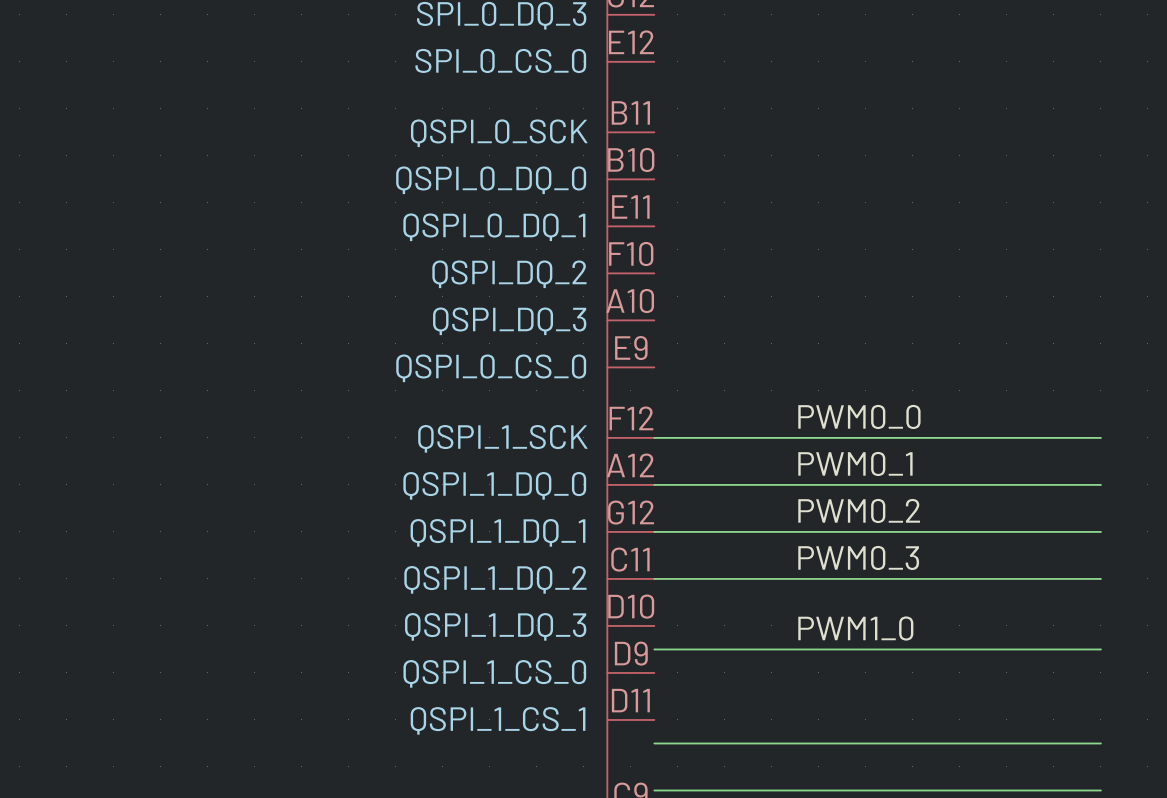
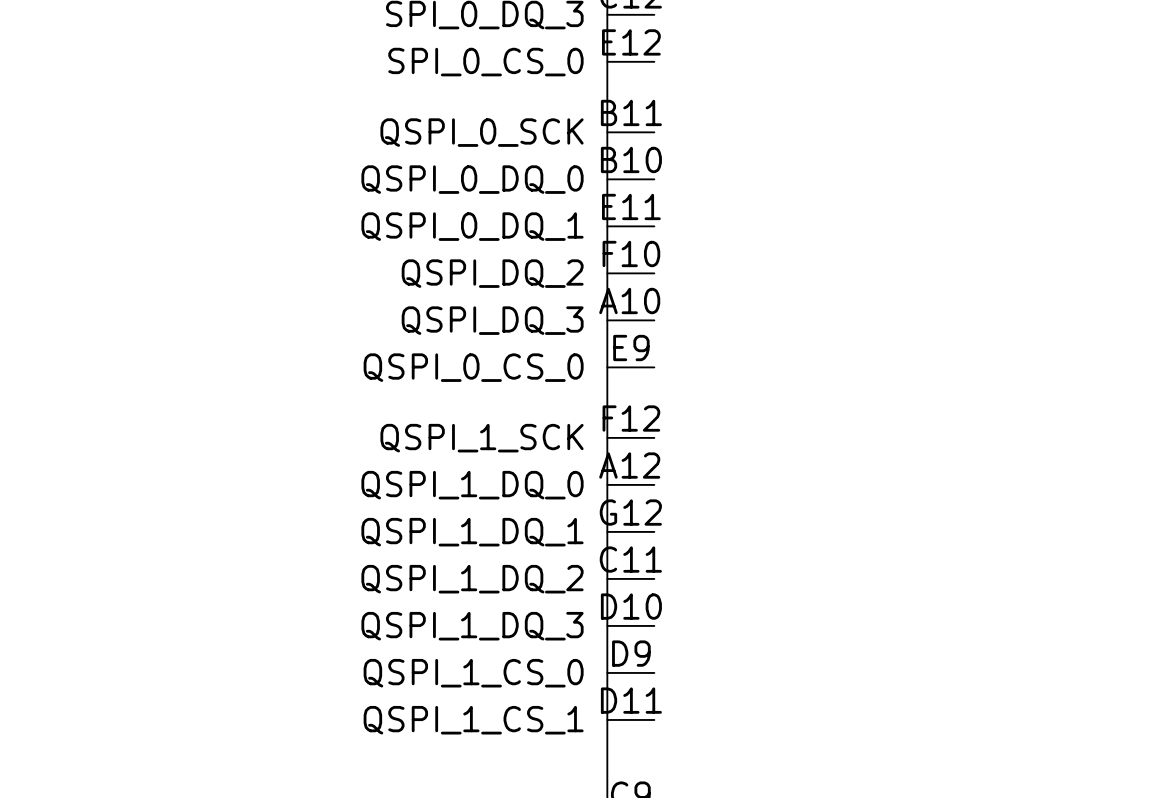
label: PWM0_0 (859, 416) -> none
wire: (654, 437) (1100, 437) -> none
label: PWM0_1 (855, 463) -> none
wire: (654, 484) (1100, 484) -> none
label: PWM0_2 (859, 510) -> none
wire: (654, 531) (1100, 531) -> none
label: PWM0_3 (858, 557) -> none
wire: (654, 578) (1100, 578) -> none
label: PWM1_0 (855, 628) -> none
wire: (654, 649) (1100, 649) -> none
wire: (654, 743) (1100, 743) -> none
wire: (654, 790) (1100, 790) -> none

